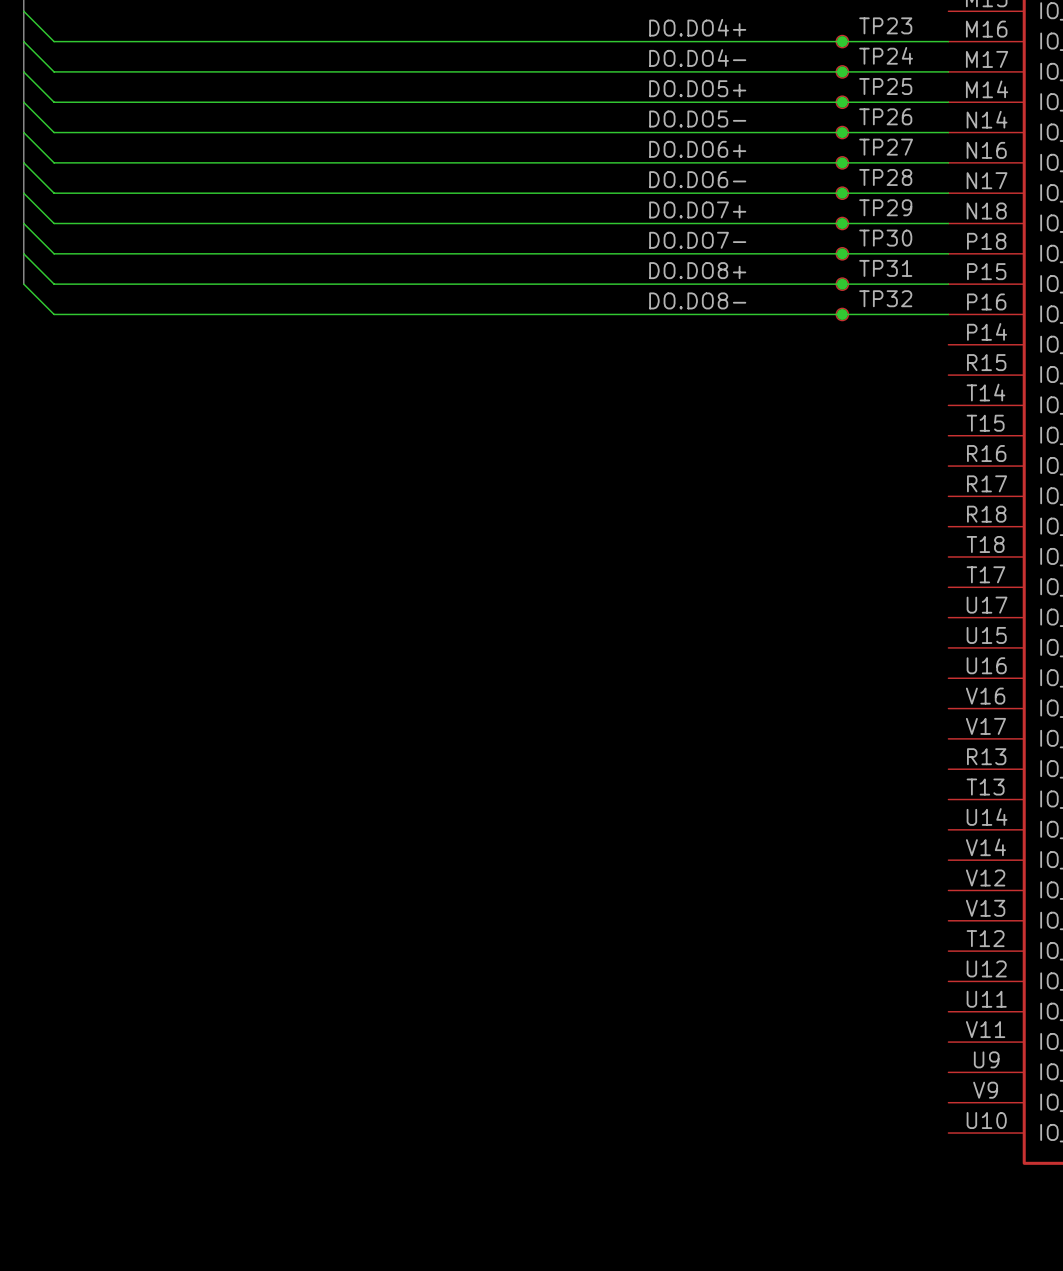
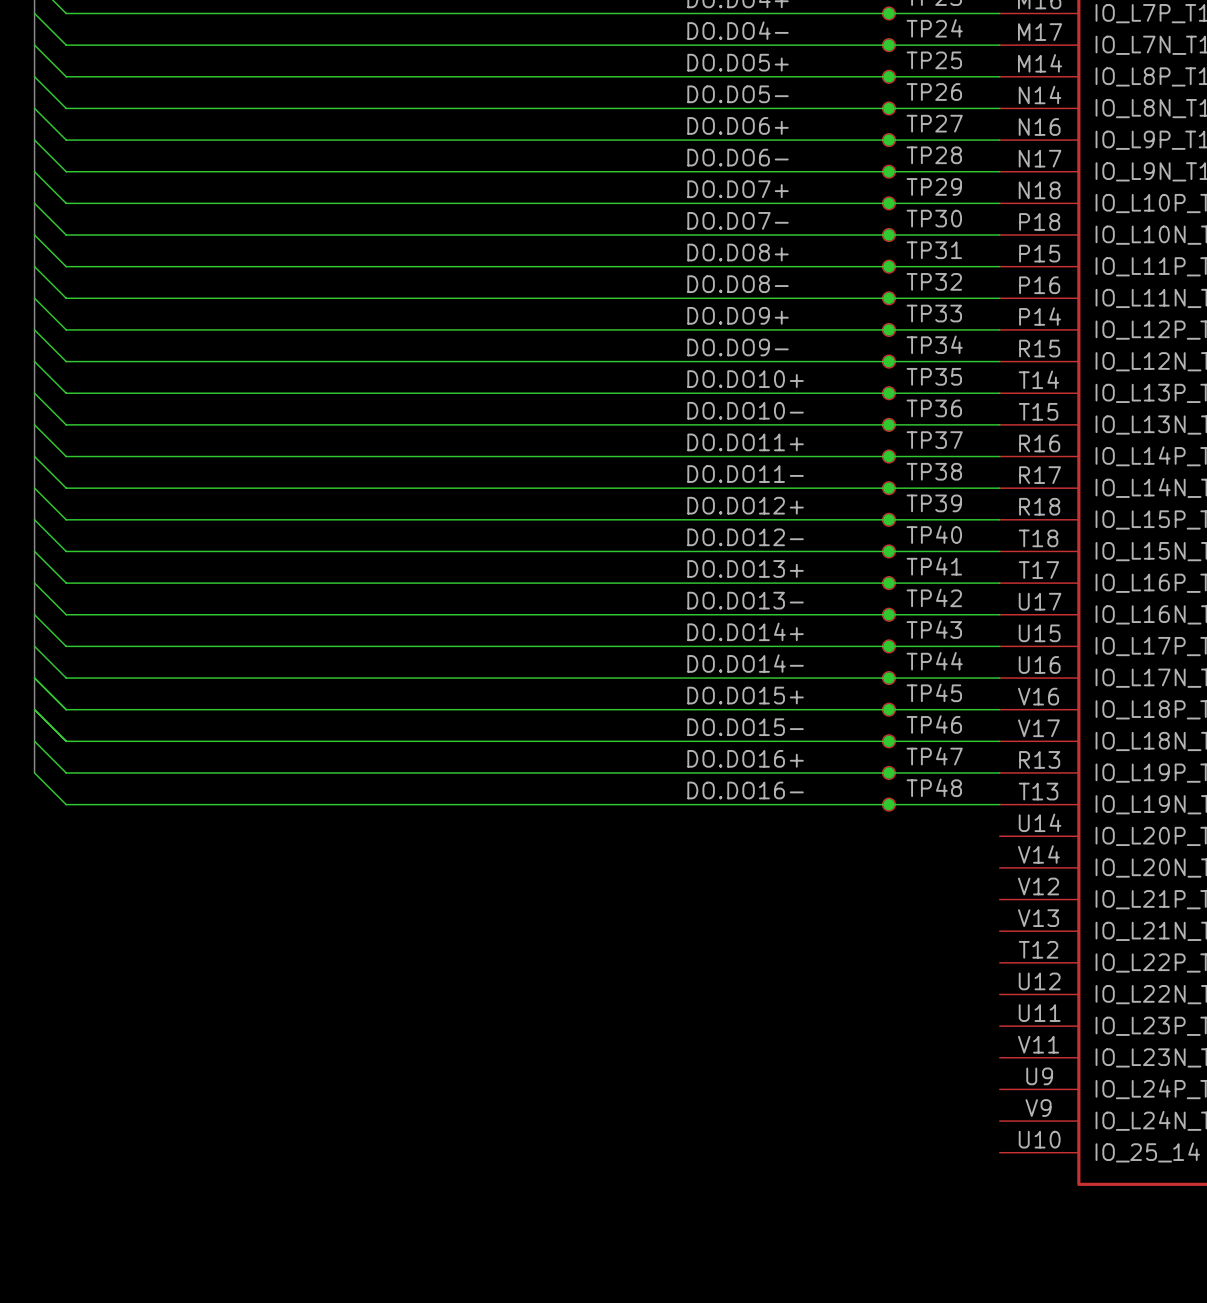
bus: none -> (34, 266) (34, 772)
wire: none -> (34, 298) (66, 329) (999, 329)
label: none -> DO.DO9+ (738, 315)
wire: none -> (34, 329) (66, 361) (999, 361)
junction: none -> (888, 329)
TP33: none -> (888, 329)
label: none -> DO.DO9- (738, 347)
wire: none -> (34, 361) (66, 393) (999, 393)
junction: none -> (888, 361)
TP34: none -> (888, 361)
label: none -> DO.DO10+ (745, 379)
wire: none -> (34, 393) (66, 424) (999, 424)
junction: none -> (888, 393)
TP35: none -> (888, 393)
label: none -> DO.DO10- (745, 410)
wire: none -> (34, 424) (66, 456) (999, 456)
junction: none -> (888, 424)
TP36: none -> (888, 424)
label: none -> DO.DO11+ (745, 442)
wire: none -> (34, 456) (66, 488) (999, 488)
junction: none -> (888, 456)
TP37: none -> (888, 456)
label: none -> DO.DO11- (745, 474)
wire: none -> (34, 488) (66, 519) (999, 519)
junction: none -> (888, 488)
TP38: none -> (888, 488)
label: none -> DO.DO12+ (745, 505)
wire: none -> (34, 519) (66, 551) (999, 551)
junction: none -> (888, 519)
TP39: none -> (888, 519)
label: none -> DO.DO12- (745, 537)
wire: none -> (34, 551) (66, 583) (999, 583)
junction: none -> (888, 551)
TP40: none -> (888, 551)
label: none -> DO.DO13+ (745, 568)
wire: none -> (34, 583) (66, 614) (999, 614)
junction: none -> (888, 583)
TP41: none -> (888, 583)
label: none -> DO.DO13- (745, 600)
wire: none -> (34, 614) (66, 646) (999, 646)
junction: none -> (888, 614)
TP42: none -> (888, 614)
label: none -> DO.DO14+ (745, 631)
wire: none -> (34, 646) (66, 678) (999, 678)
junction: none -> (888, 646)
TP43: none -> (888, 646)
label: none -> DO.DO14- (745, 663)
wire: none -> (34, 678) (66, 709) (999, 709)
junction: none -> (888, 678)
TP44: none -> (888, 678)
label: none -> DO.DO15+ (745, 695)
wire: none -> (34, 709) (66, 741) (999, 741)
junction: none -> (888, 709)
TP45: none -> (888, 709)
label: none -> DO.DO15- (745, 727)
wire: none -> (34, 741) (66, 772) (999, 772)
junction: none -> (888, 741)
TP46: none -> (888, 741)
label: none -> DO.DO16+ (745, 758)
wire: none -> (34, 772) (66, 804) (999, 804)
junction: none -> (888, 772)
TP47: none -> (888, 772)
label: none -> DO.DO16- (745, 790)
junction: none -> (888, 804)
TP48: none -> (888, 804)

